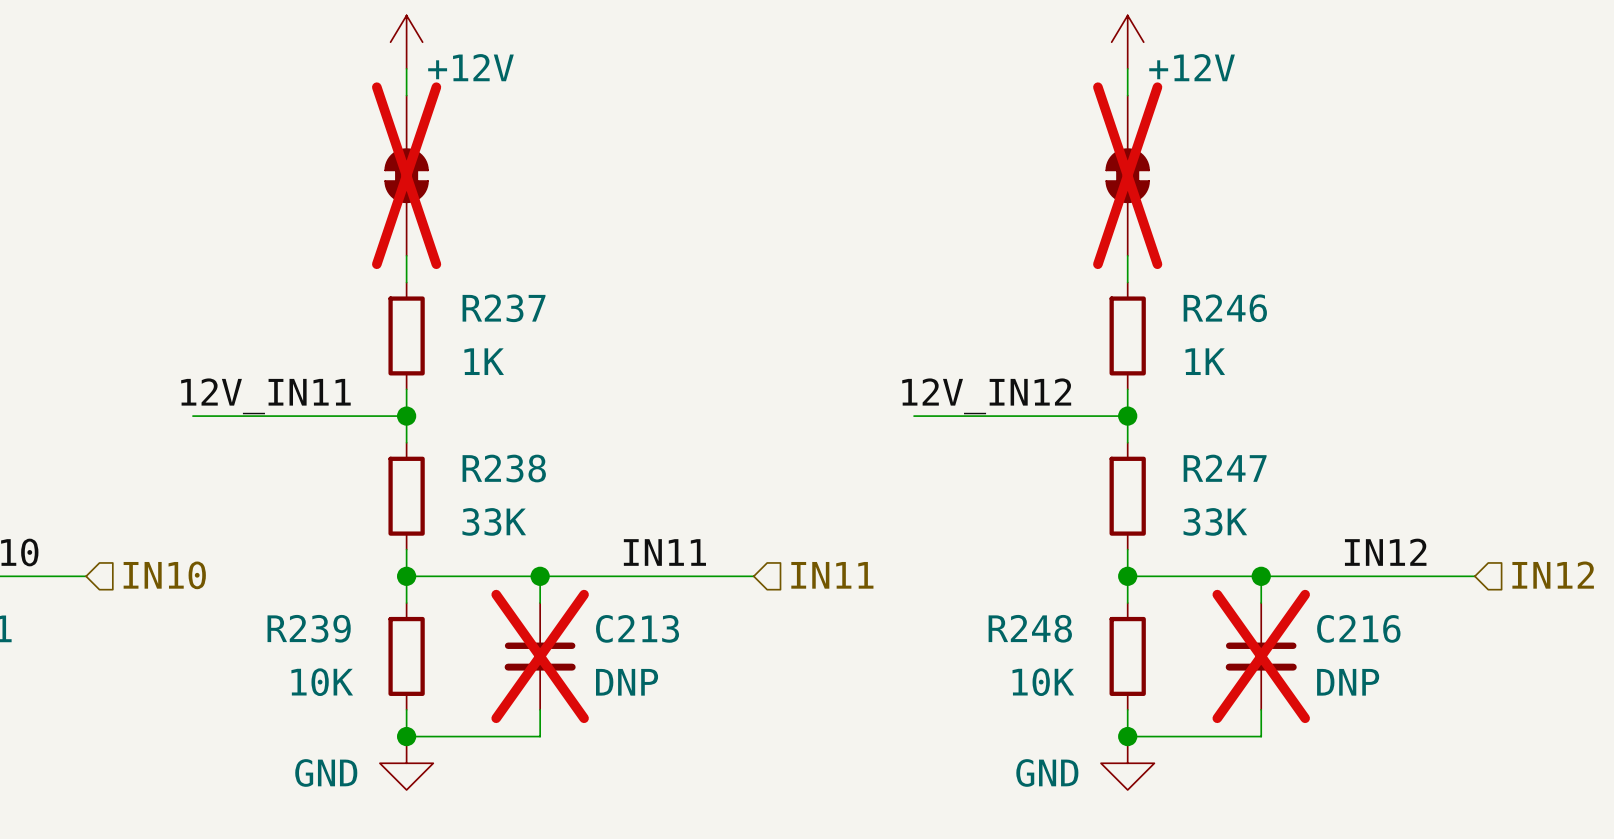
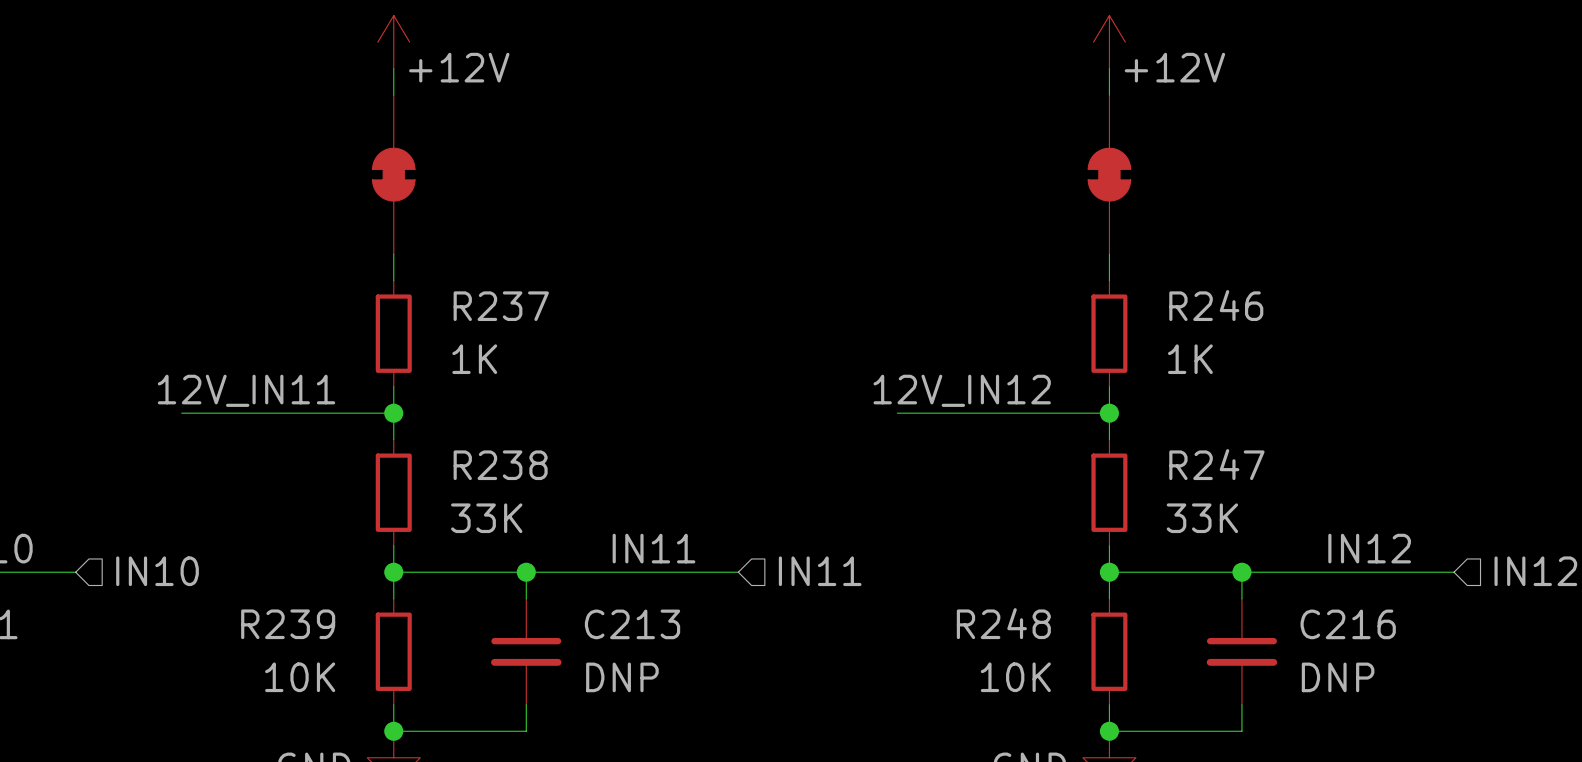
part do-not-place cross: (406, 175) -> none
part do-not-place cross: (1127, 175) -> none
C213 do-not-place cross: (540, 656) -> none
C216 do-not-place cross: (1261, 656) -> none

